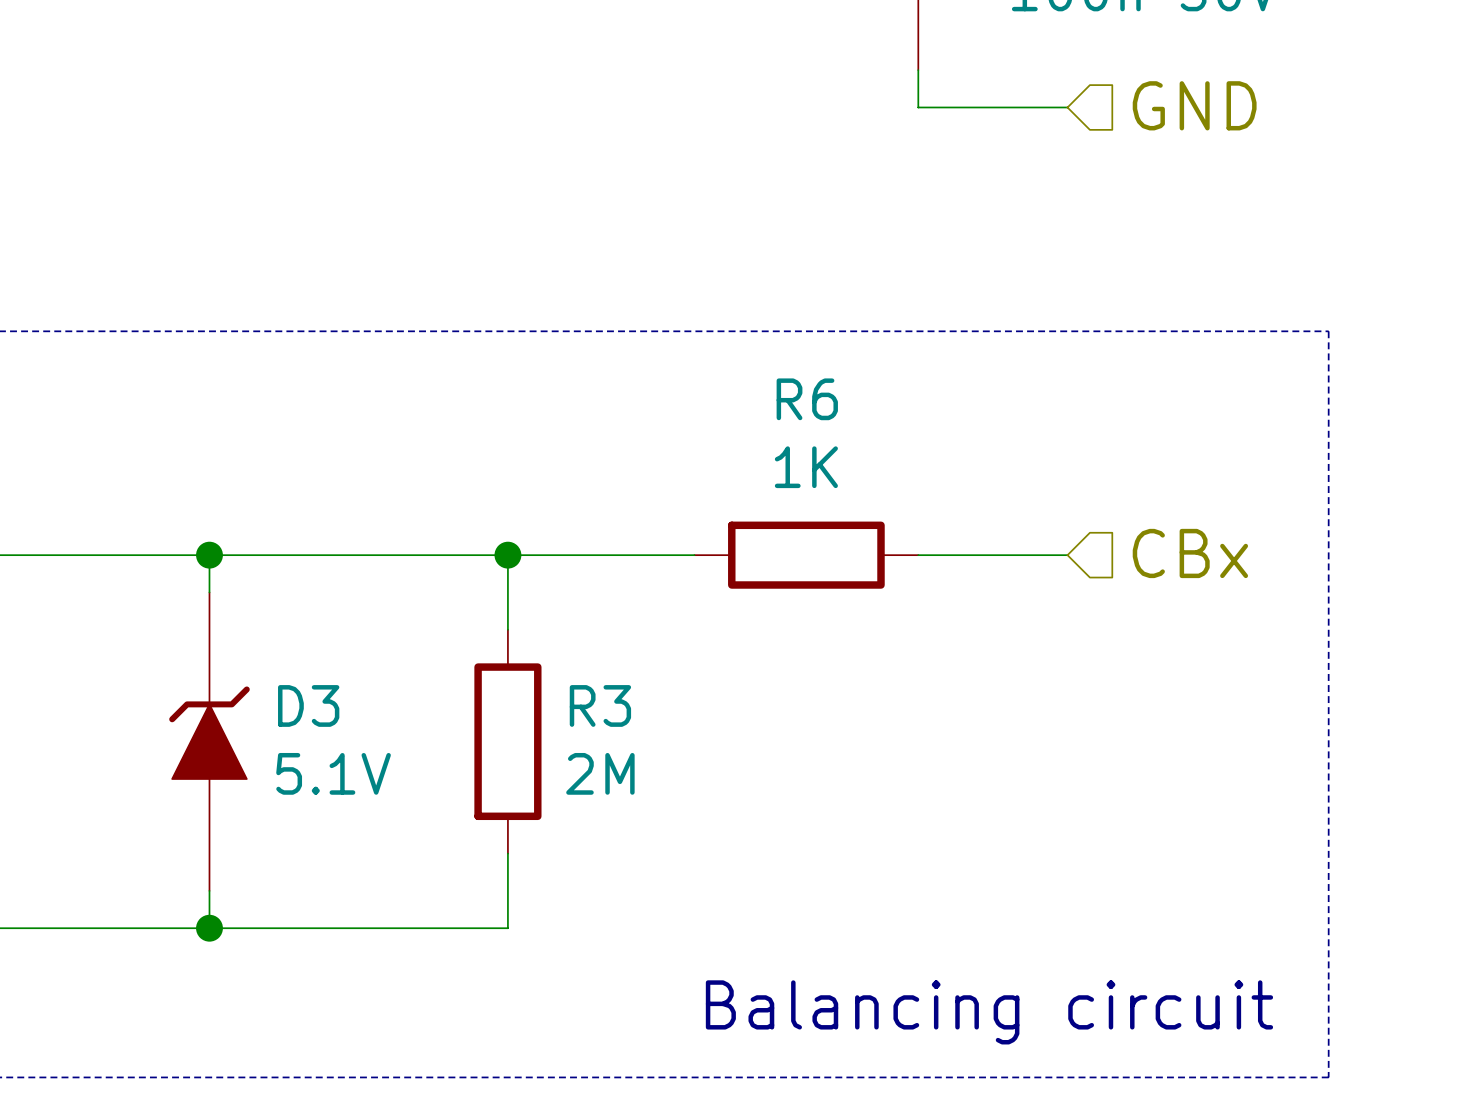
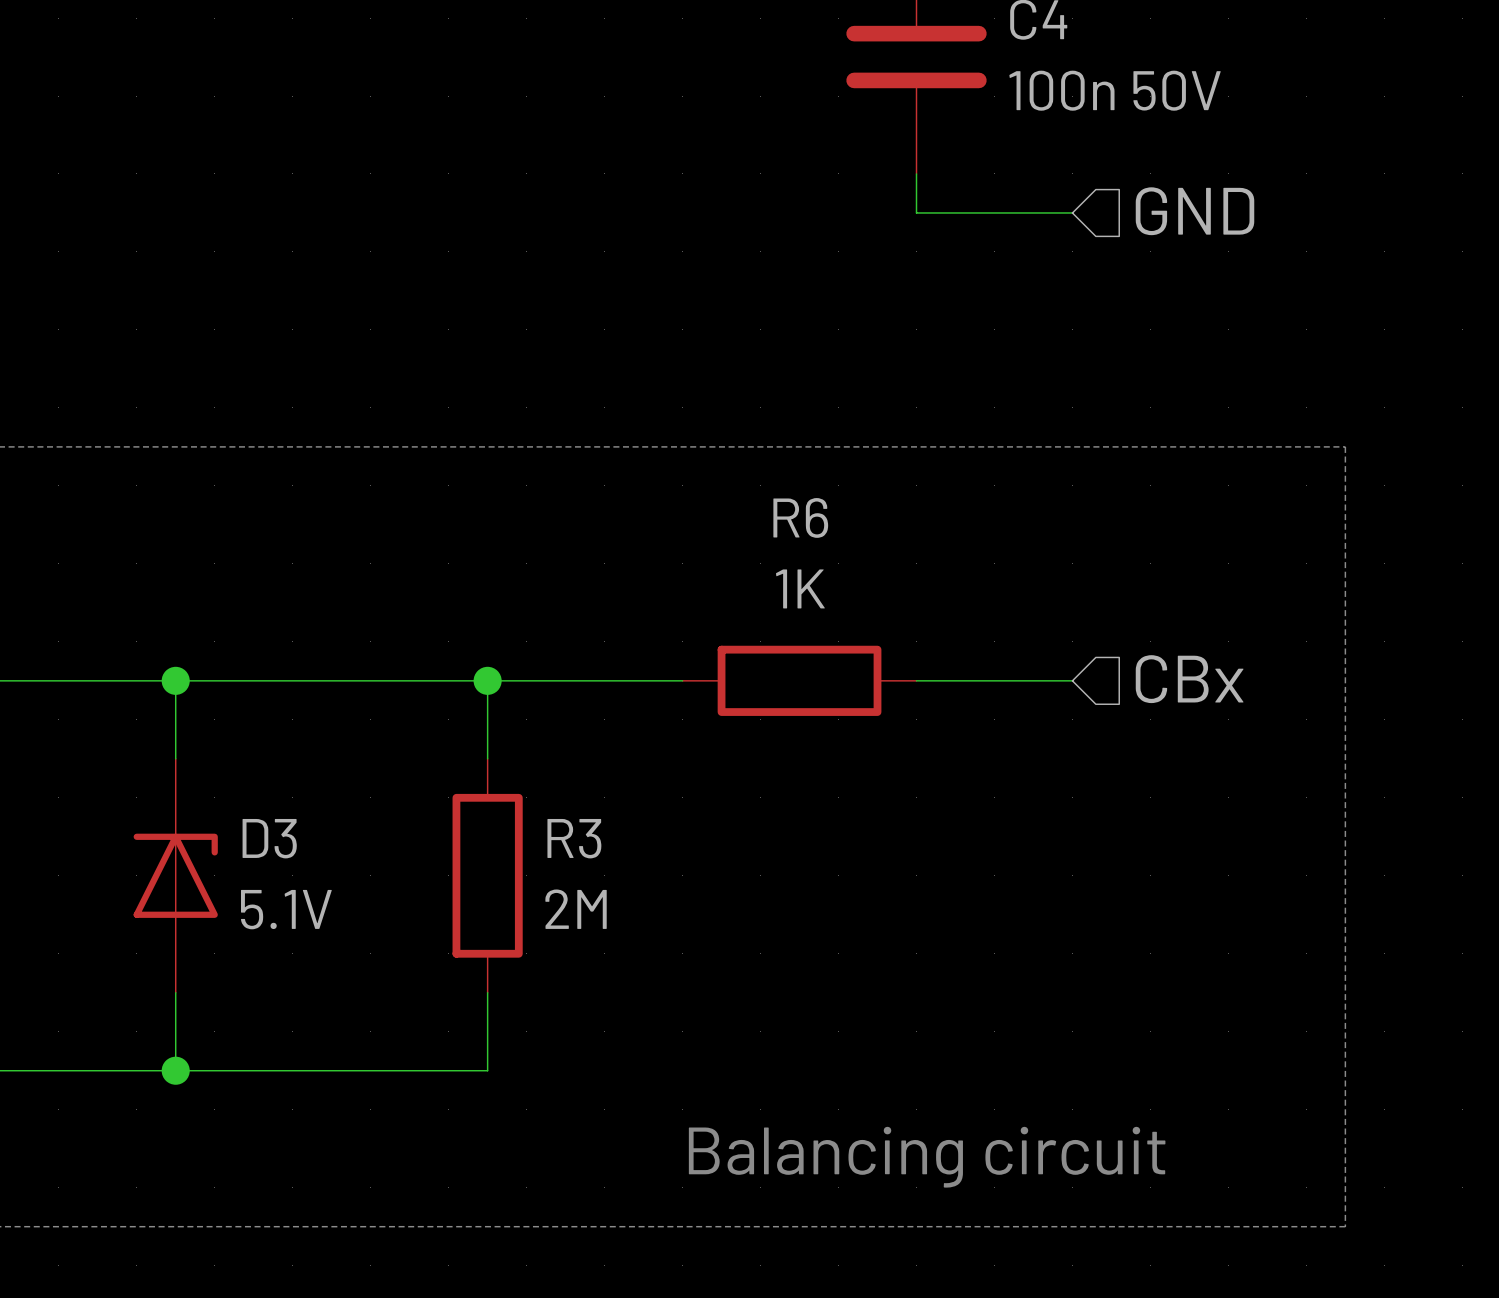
D3 symbol: [169, 592, 250, 891] -> [133, 758, 218, 993]

